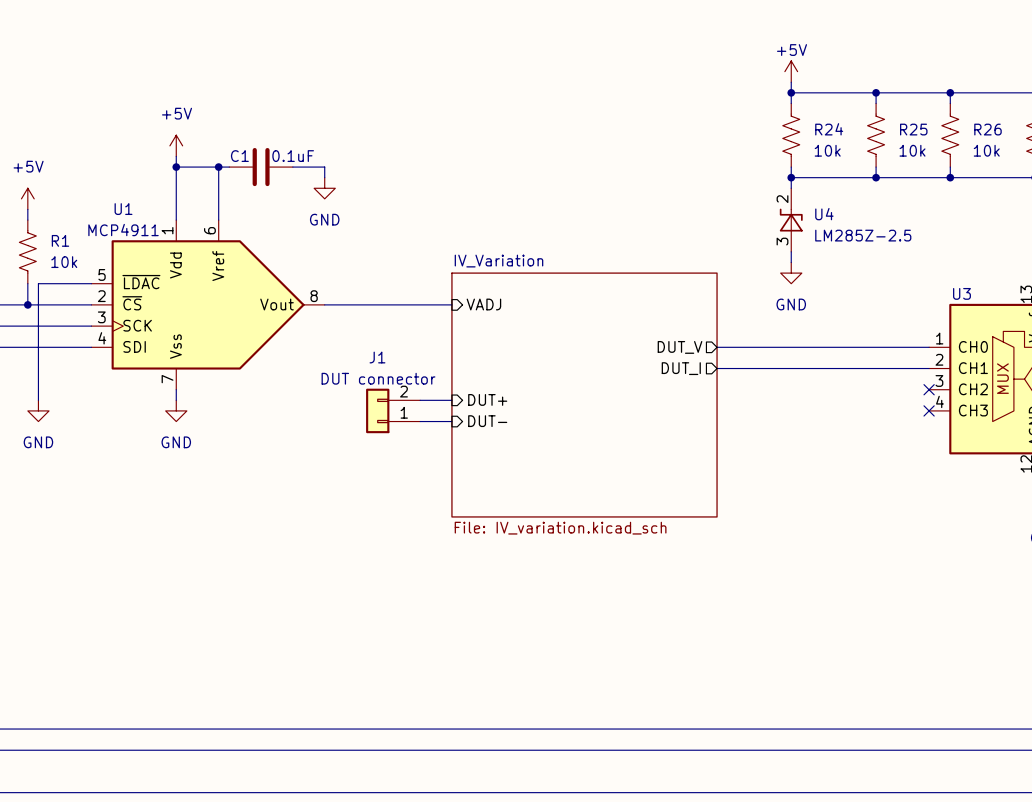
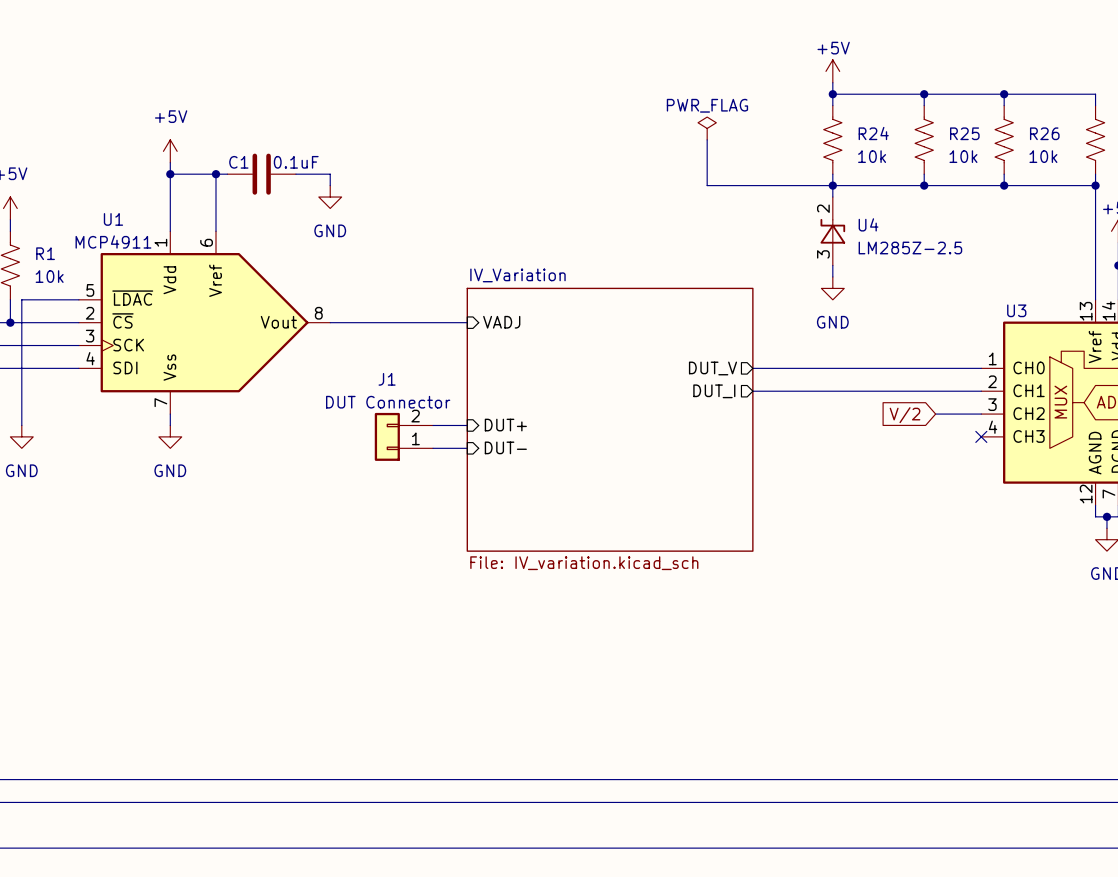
power symbol: none -> PWR_FLAG (707, 128)
wire: none -> (707, 139) (707, 185) (832, 185)
J1 value: DUT connector (378, 378) -> DUT Connector (388, 402)
wire: none -> (935, 414) (981, 414)
no-connect mark: (929, 389) -> none
global label: none -> V/2 (905, 415)

